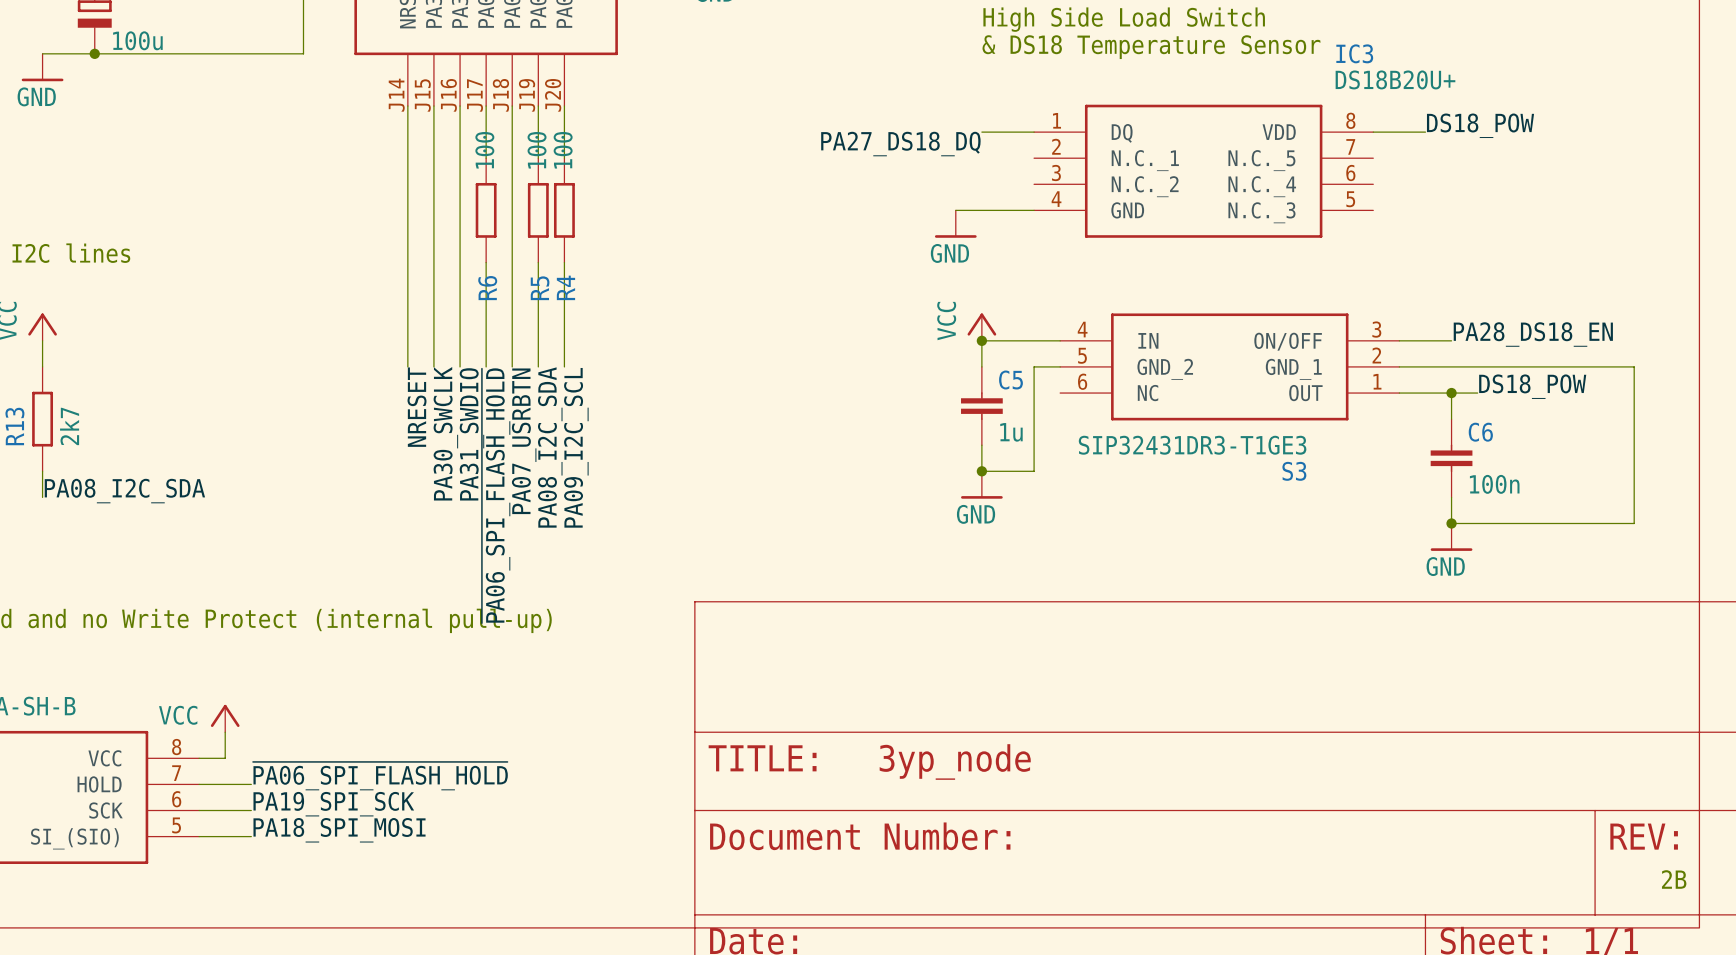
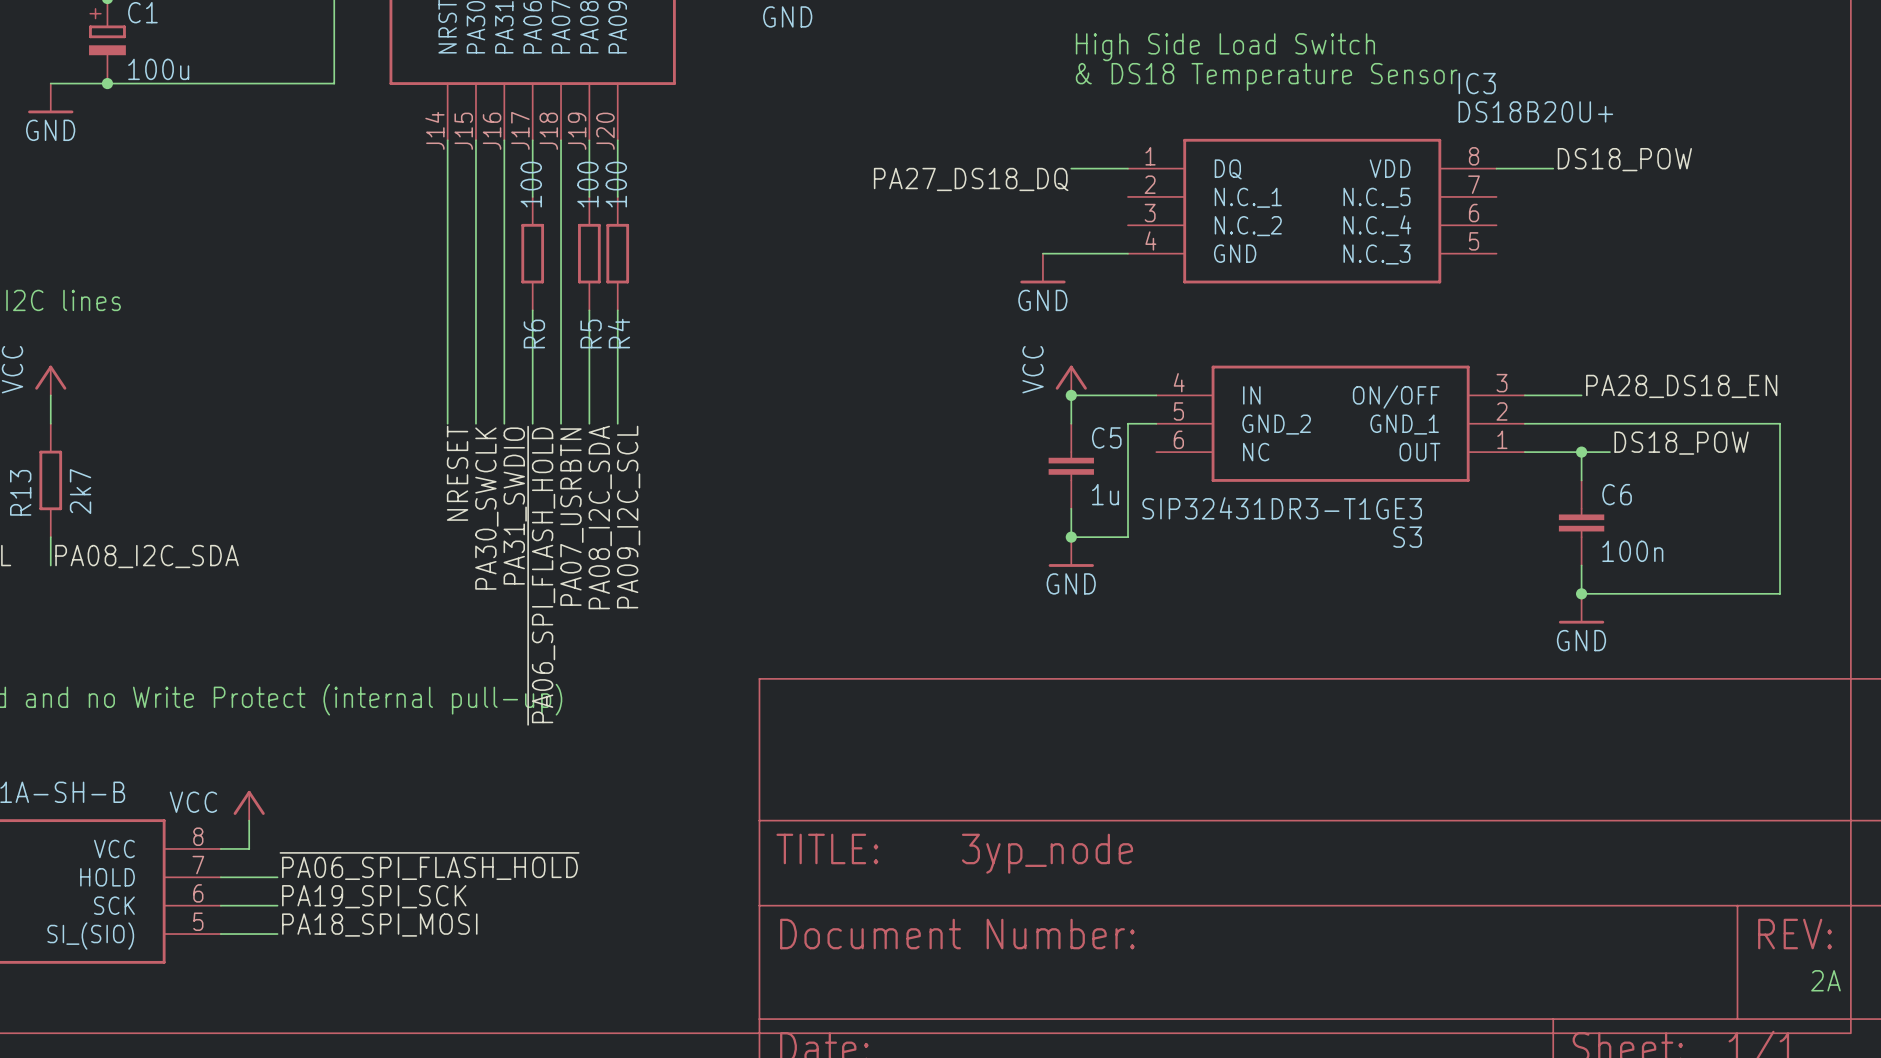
text: 2B (1674, 879) -> 2A (1825, 980)

